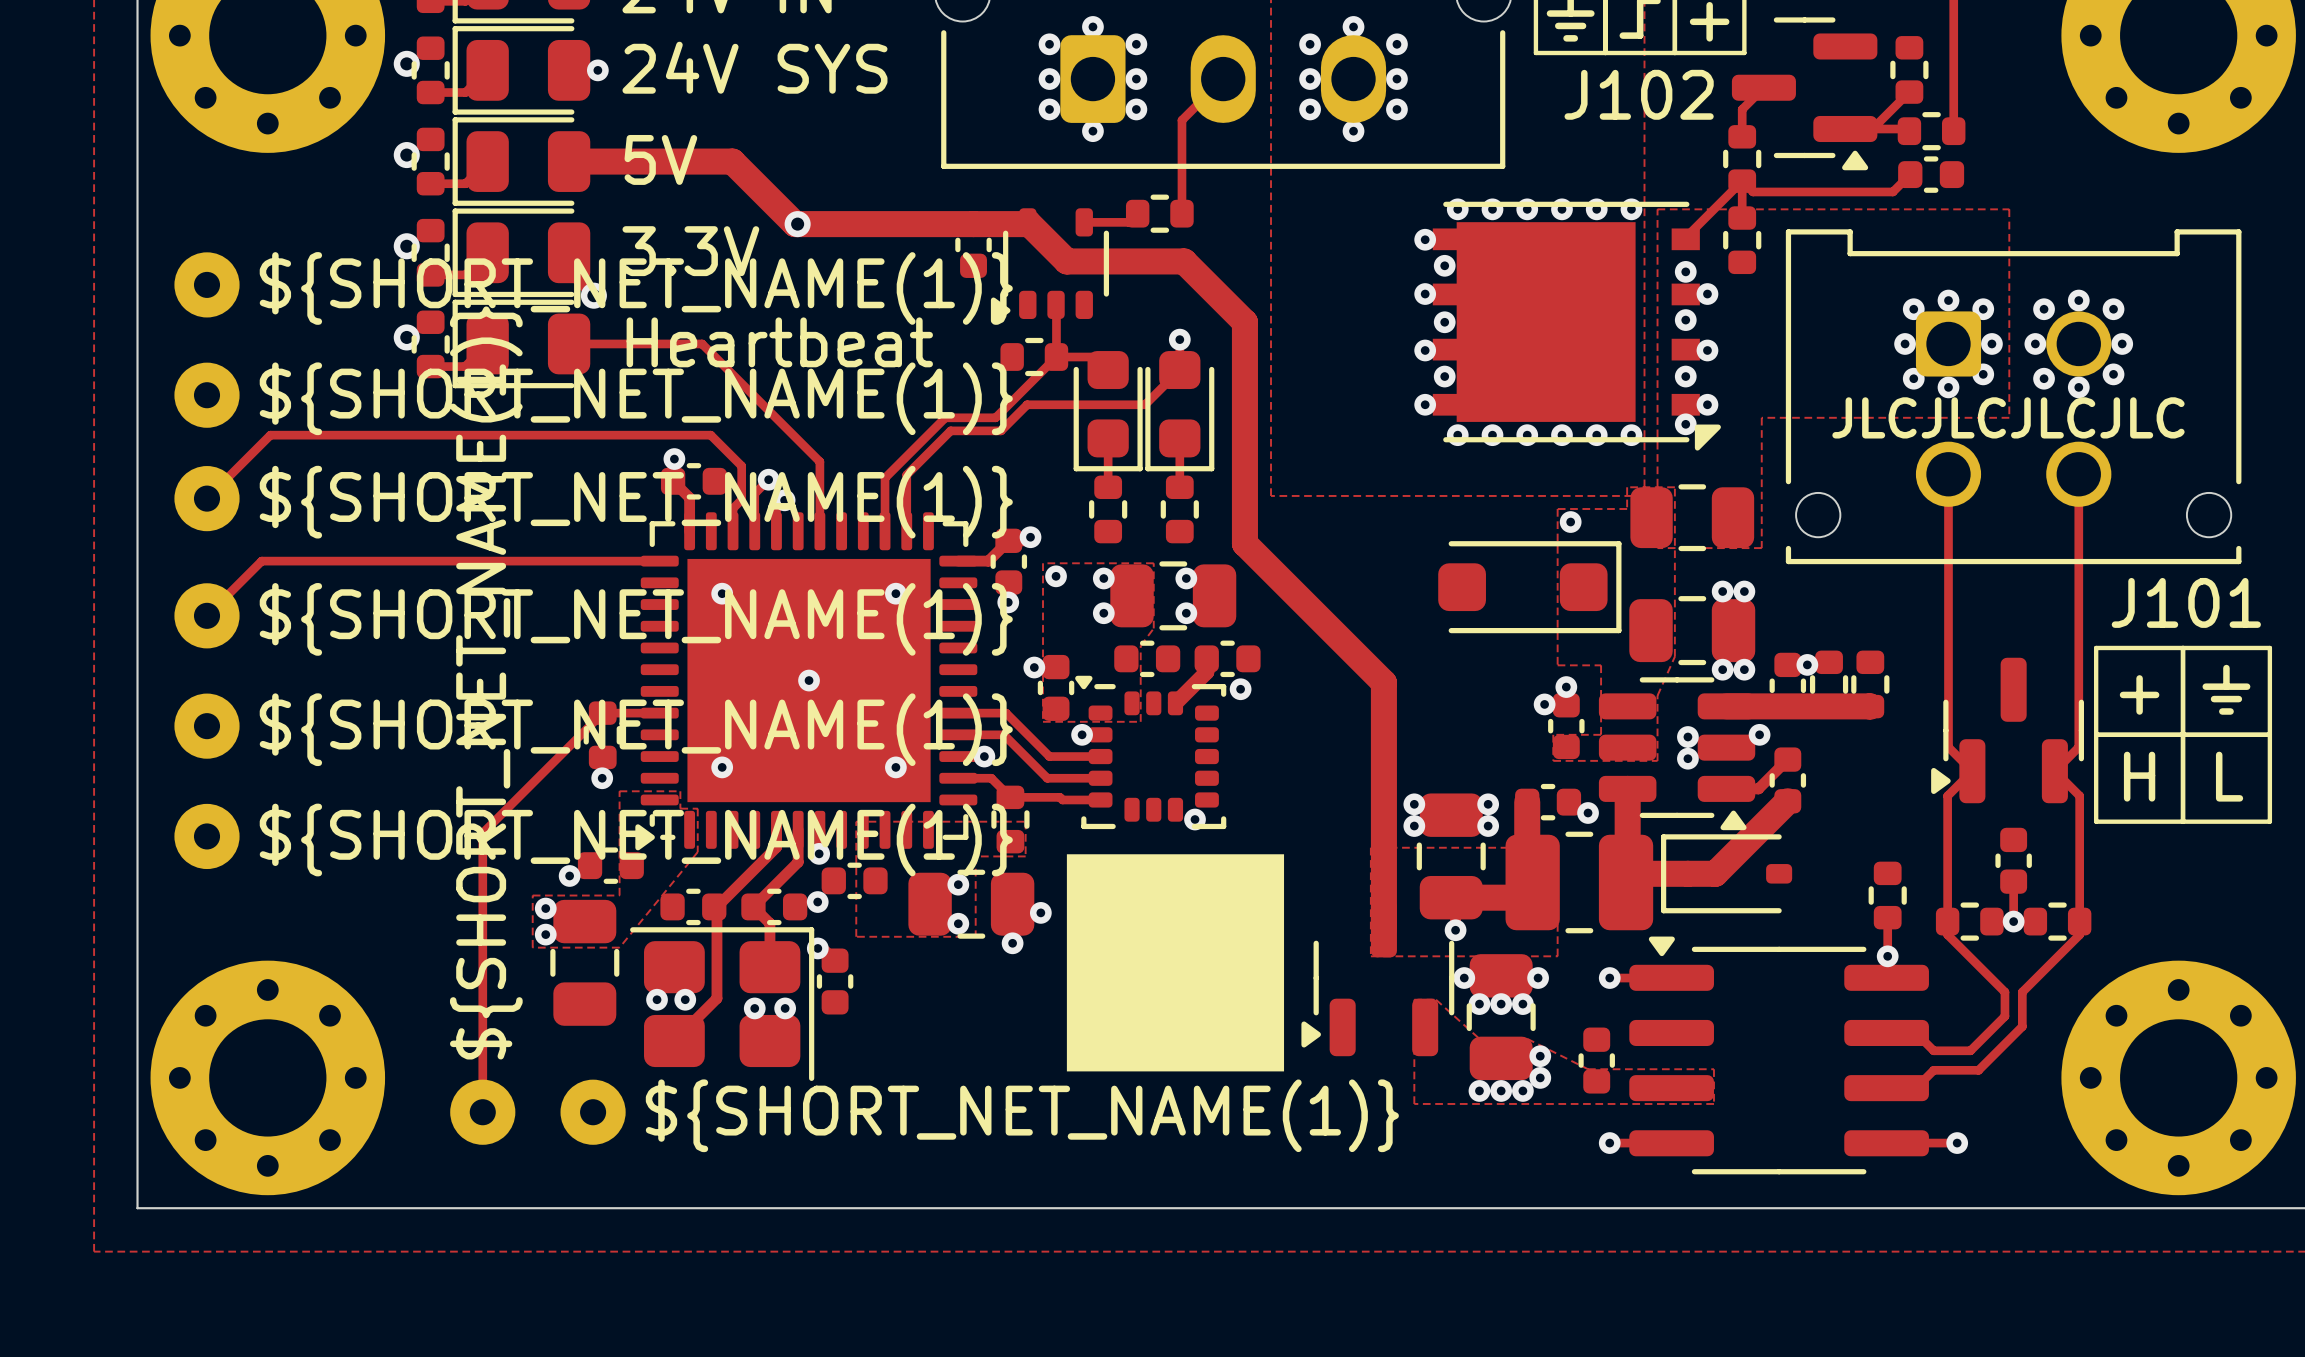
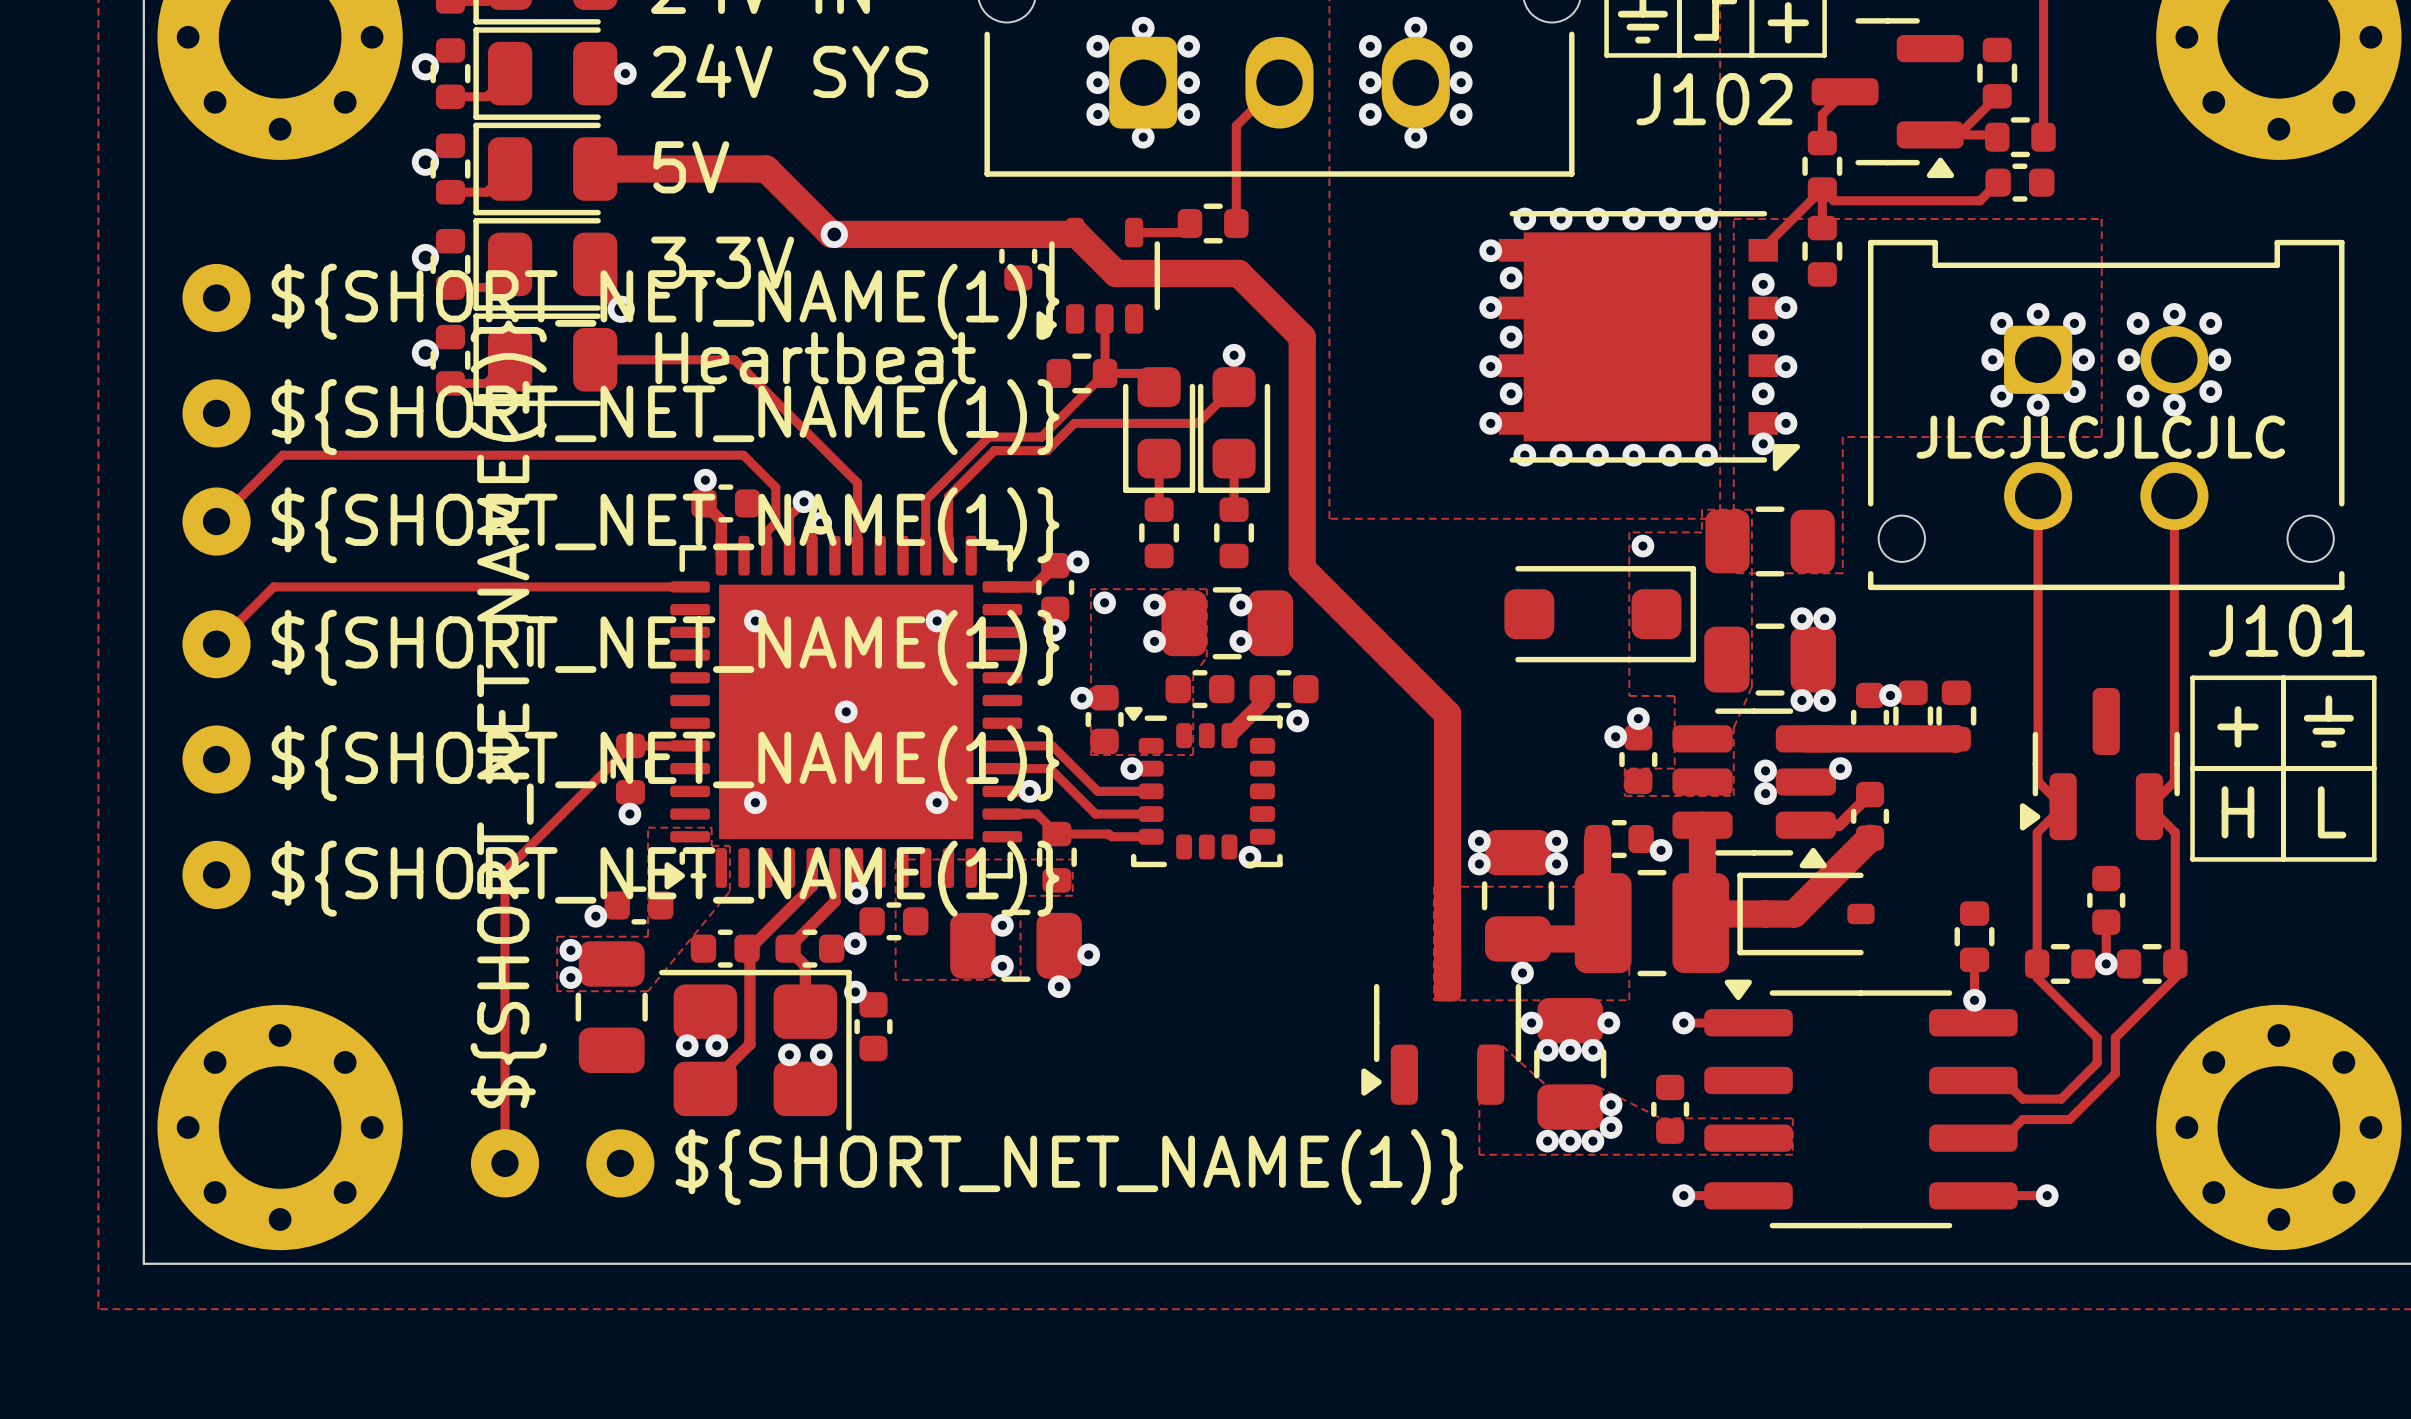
drawing: [1066, 854, 1285, 1072] -> none

